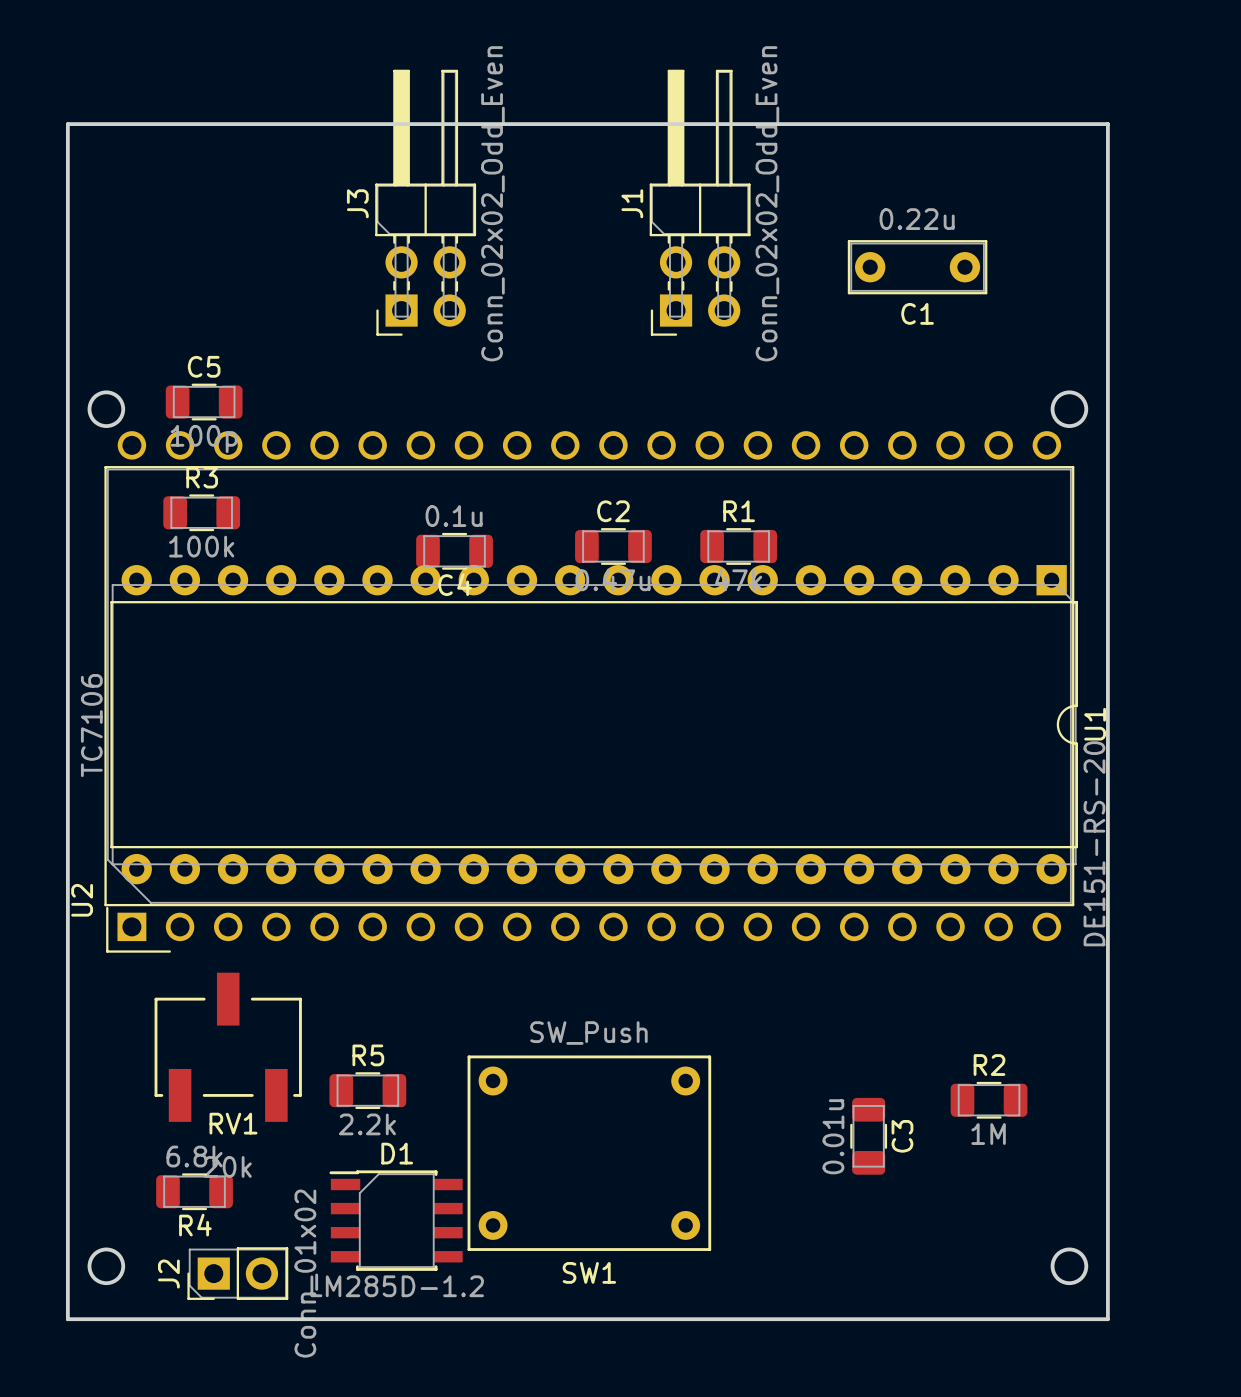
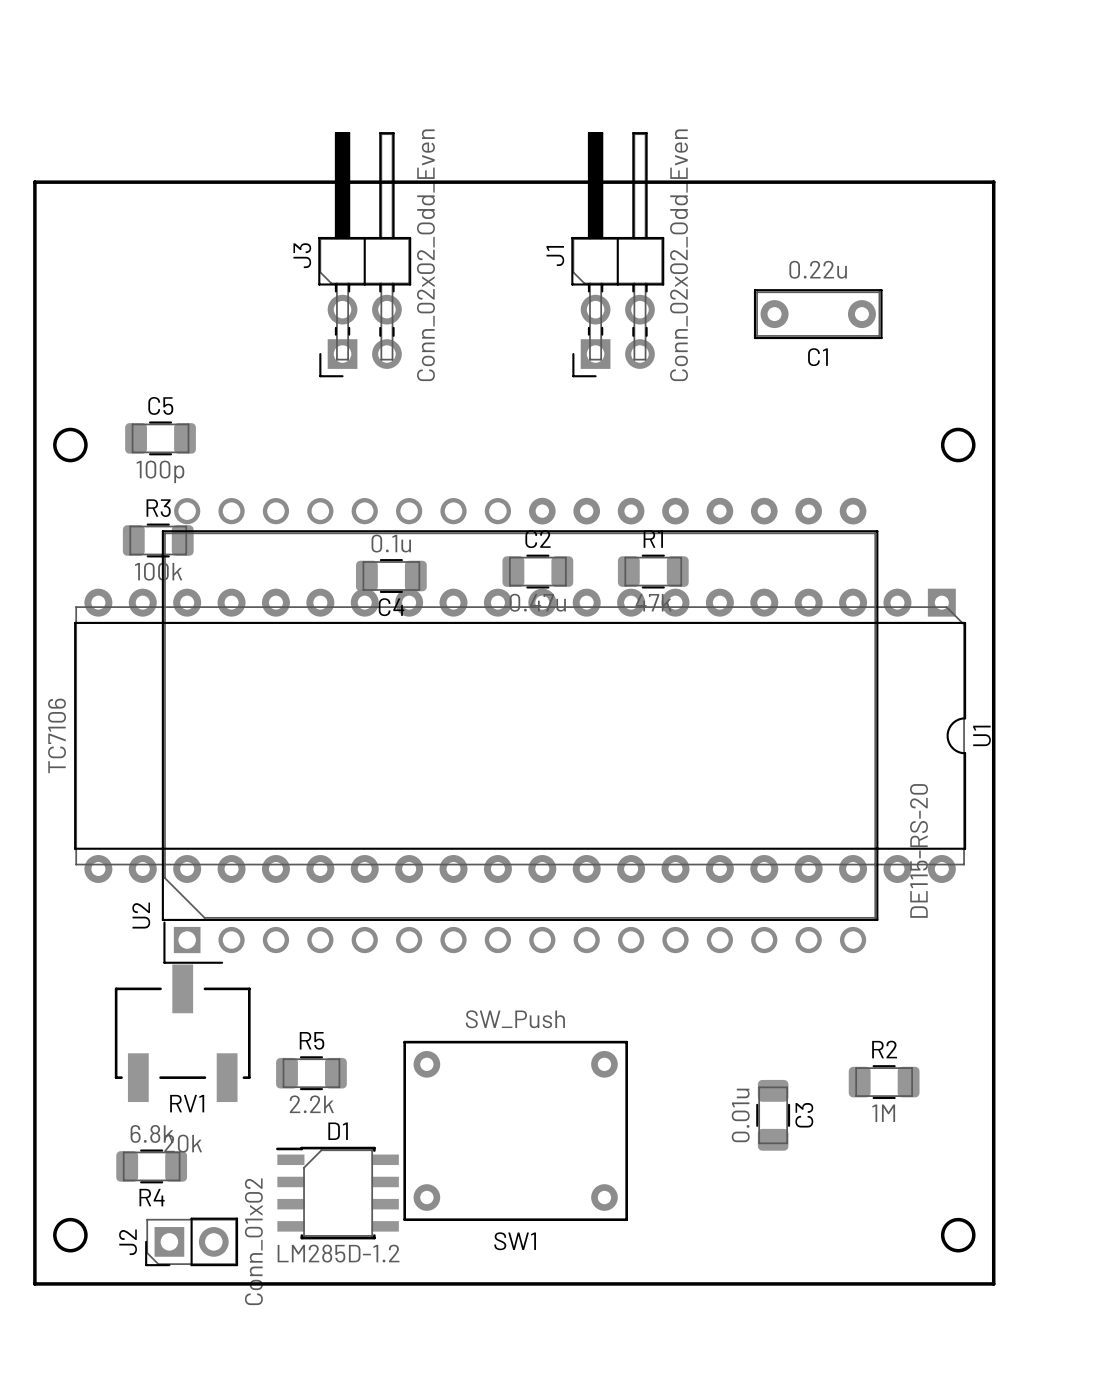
U2 footprint: [104, 431, 1075, 953] -> [161, 497, 879, 964]
U2 value: DE151-RS-20 (1094, 843) -> DE115-RS-20 (919, 850)
U2 name position: U2 (82, 900) -> U2 (141, 915)

